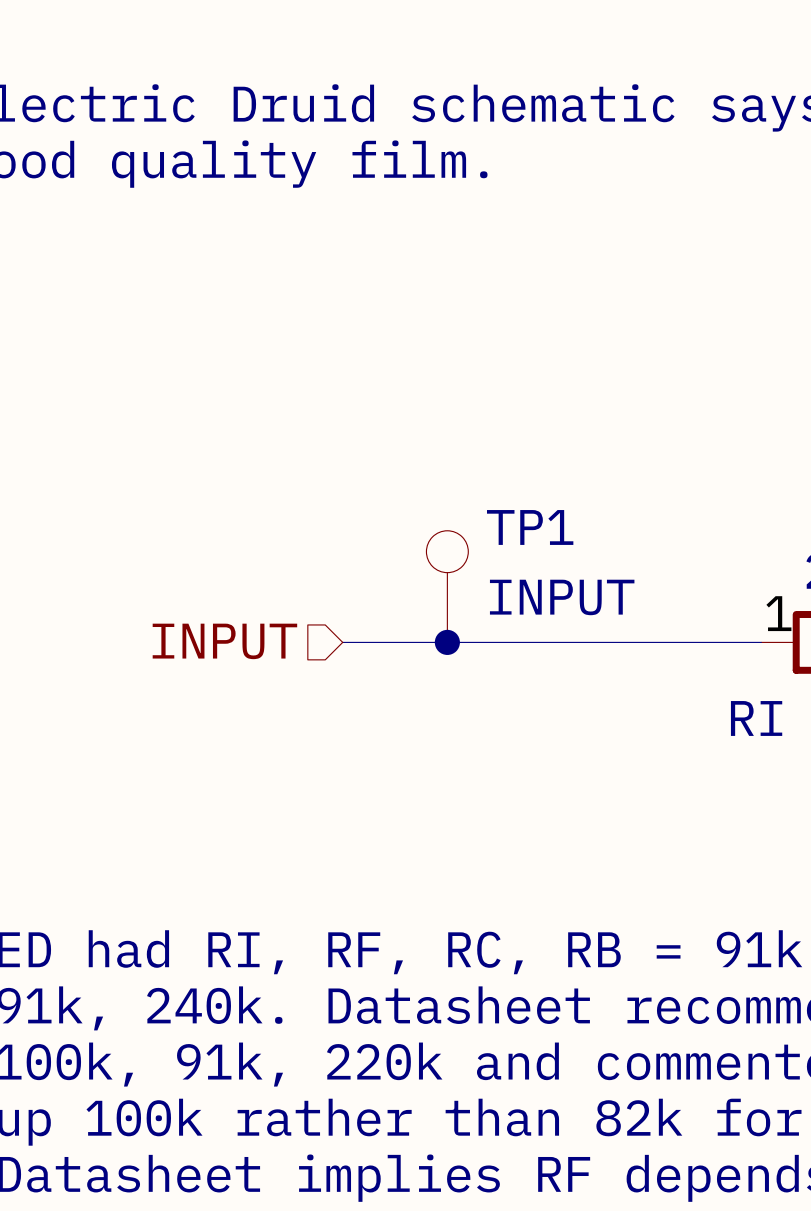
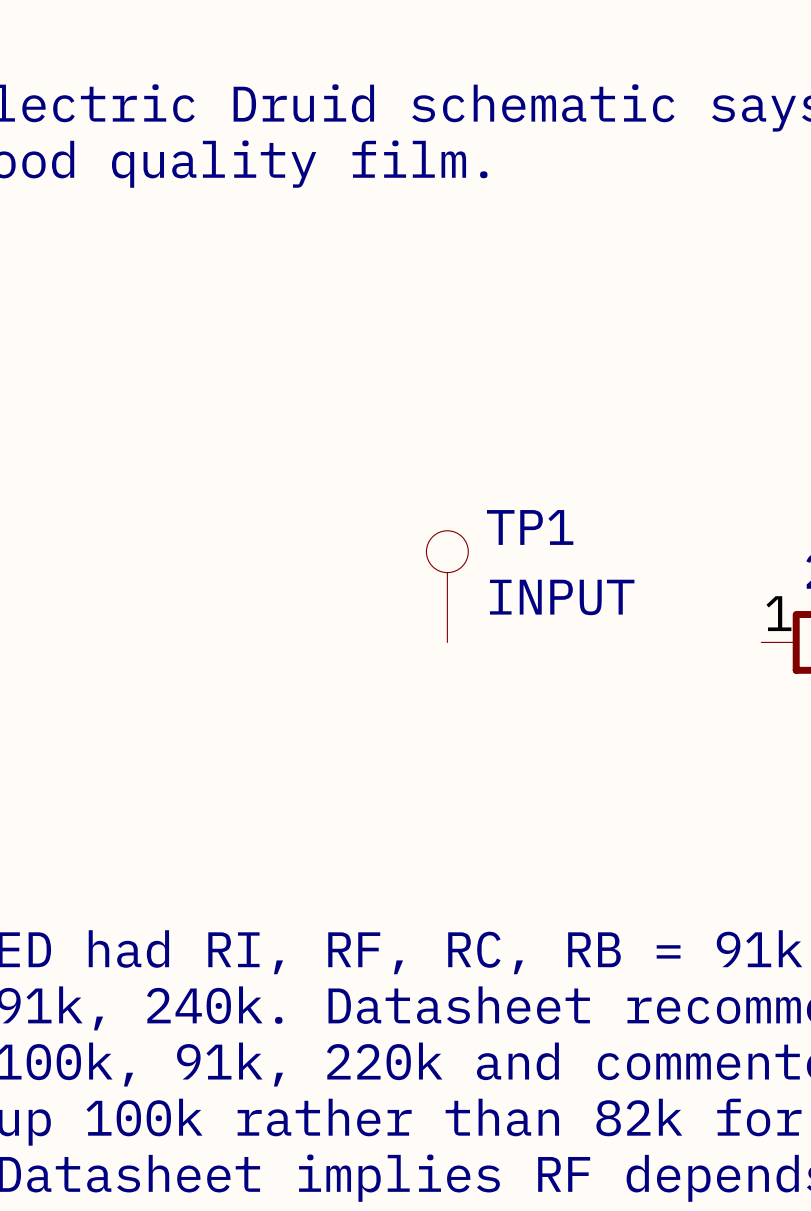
hierarchical label: INPUT (224, 641) -> none
wire: (342, 642) (761, 642) -> none
junction: (447, 642) -> none
text: RI (756, 718) -> none

